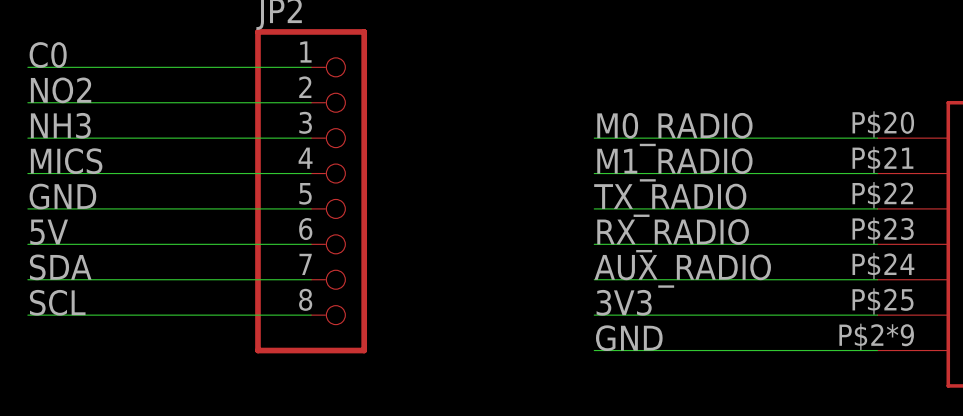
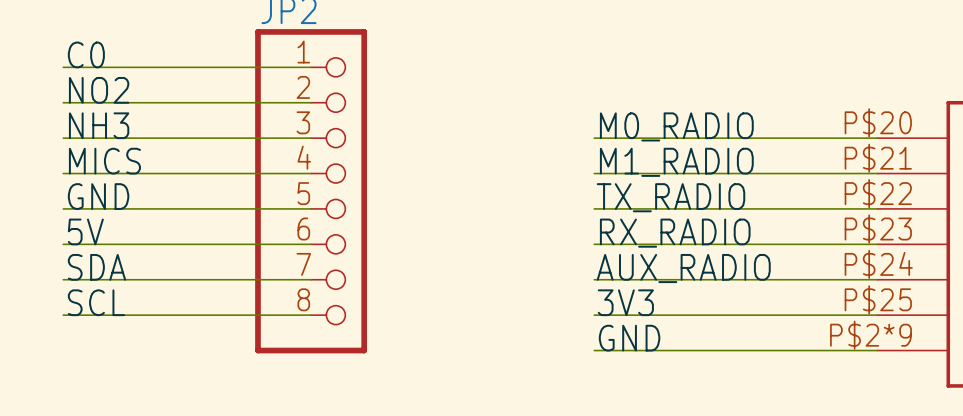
label position: C0 (48, 54) -> C0 (86, 54)
wire: (27, 67) (63, 67) -> none
label position: NO2 (61, 90) -> NO2 (99, 90)
wire: (27, 102) (63, 102) -> none
label position: NH3 (60, 125) -> NH3 (99, 125)
wire: (27, 138) (63, 138) -> none
label position: MICS (66, 161) -> MICS (104, 161)
wire: (27, 173) (63, 173) -> none
label position: GND (62, 196) -> GND (98, 196)
wire: (27, 208) (63, 208) -> none
label position: 5V (49, 232) -> 5V (85, 231)
wire: (27, 244) (63, 244) -> none
label position: SDA (60, 267) -> SDA (96, 267)
wire: (27, 279) (63, 279) -> none
label position: SCL (57, 302) -> SCL (96, 302)
wire: (27, 315) (63, 315) -> none

